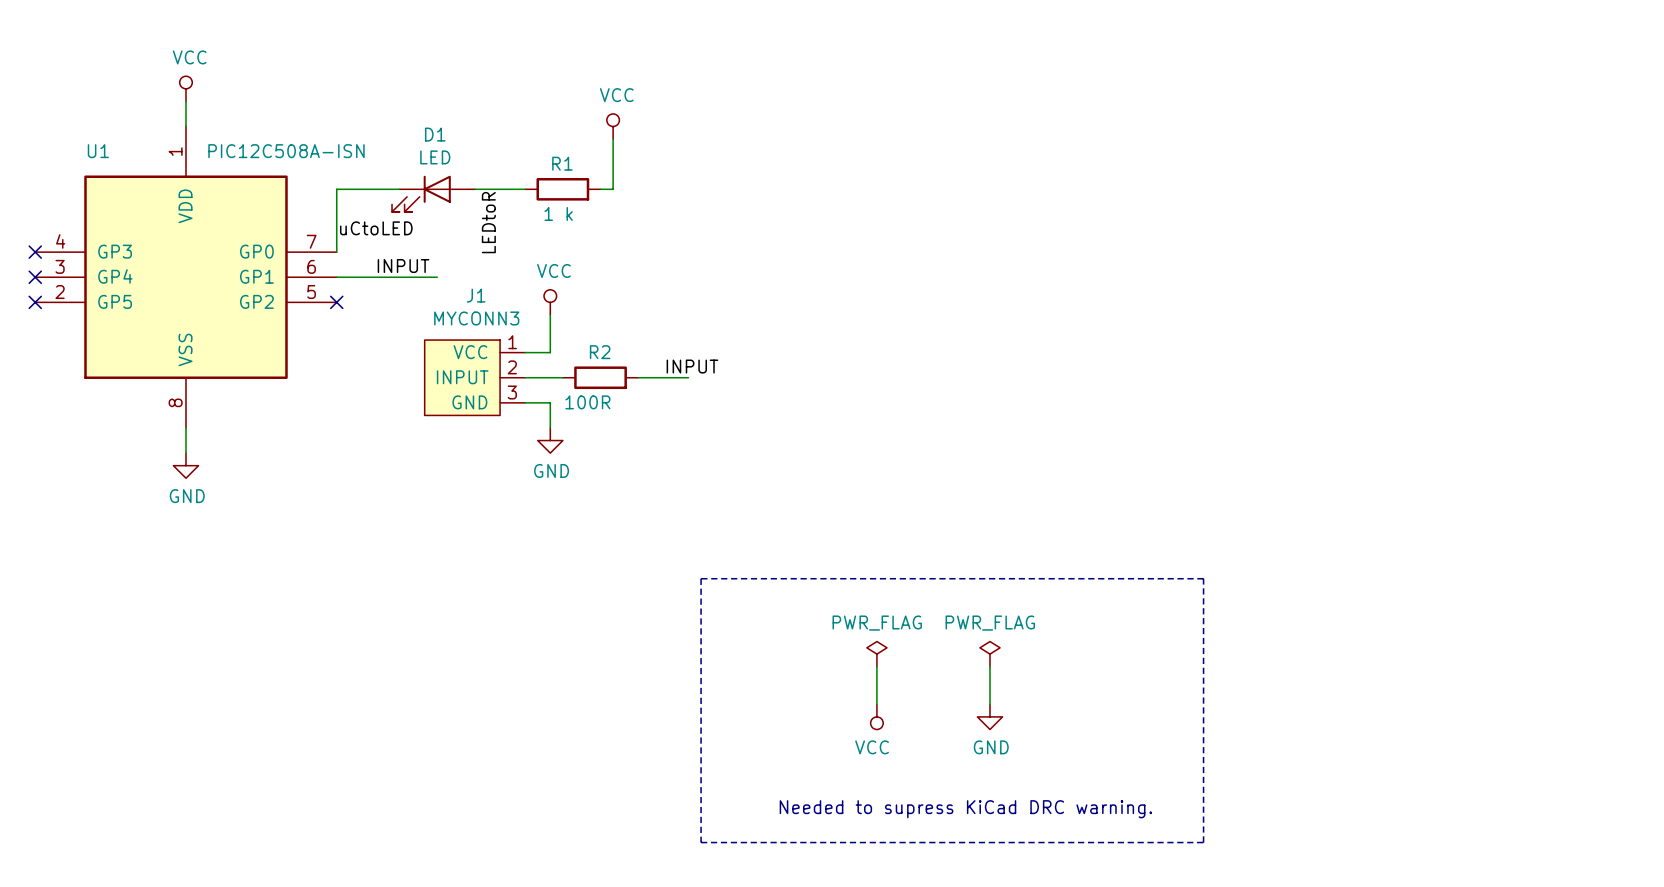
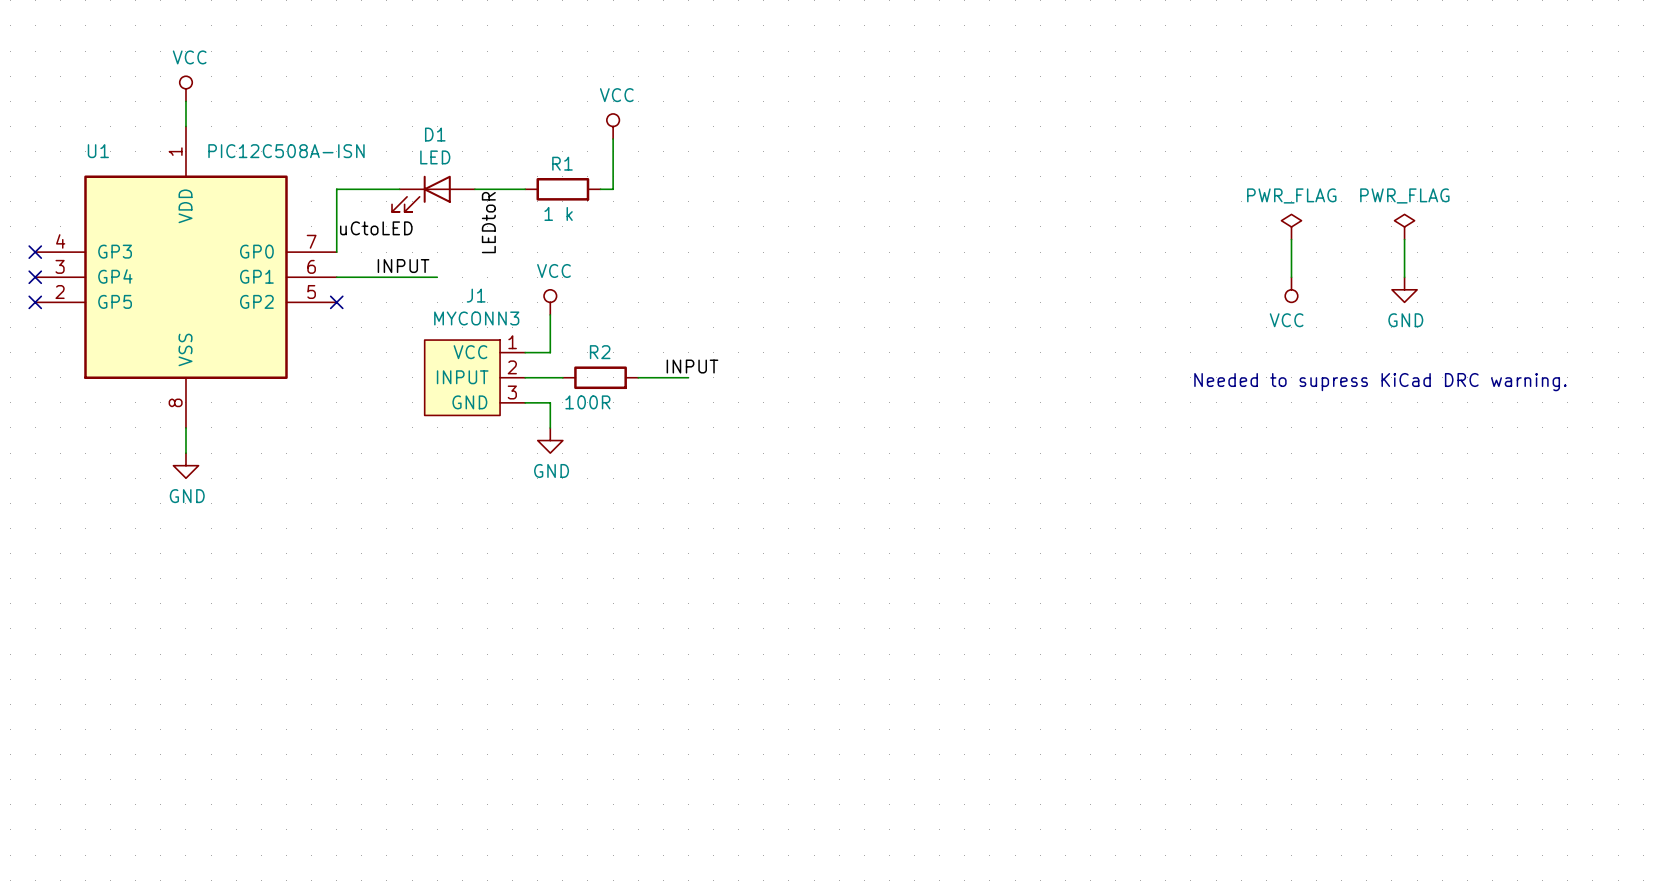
power symbol: none -> PWR_FLAG (1291, 226)
power symbol: none -> PWR_FLAG (1404, 226)
wire: none -> (1291, 239) (1291, 277)
wire: none -> (1404, 239) (1404, 277)
power symbol: none -> VCC (1291, 289)
power symbol: none -> GND (1404, 289)
text: none -> Needed to supress KiCad DRC warning. (1380, 382)
line: (701, 578) (701, 842) (1203, 842) (1203, 578) (701, 578) -> none
power symbol: PWR_FLAG (876, 654) -> none
power symbol: PWR_FLAG (989, 654) -> none
wire: (876, 666) (876, 704) -> none
wire: (989, 666) (989, 704) -> none
power symbol: VCC (876, 716) -> none
power symbol: GND (989, 716) -> none
text: Needed to supress KiCad DRC warning. (965, 809) -> none

